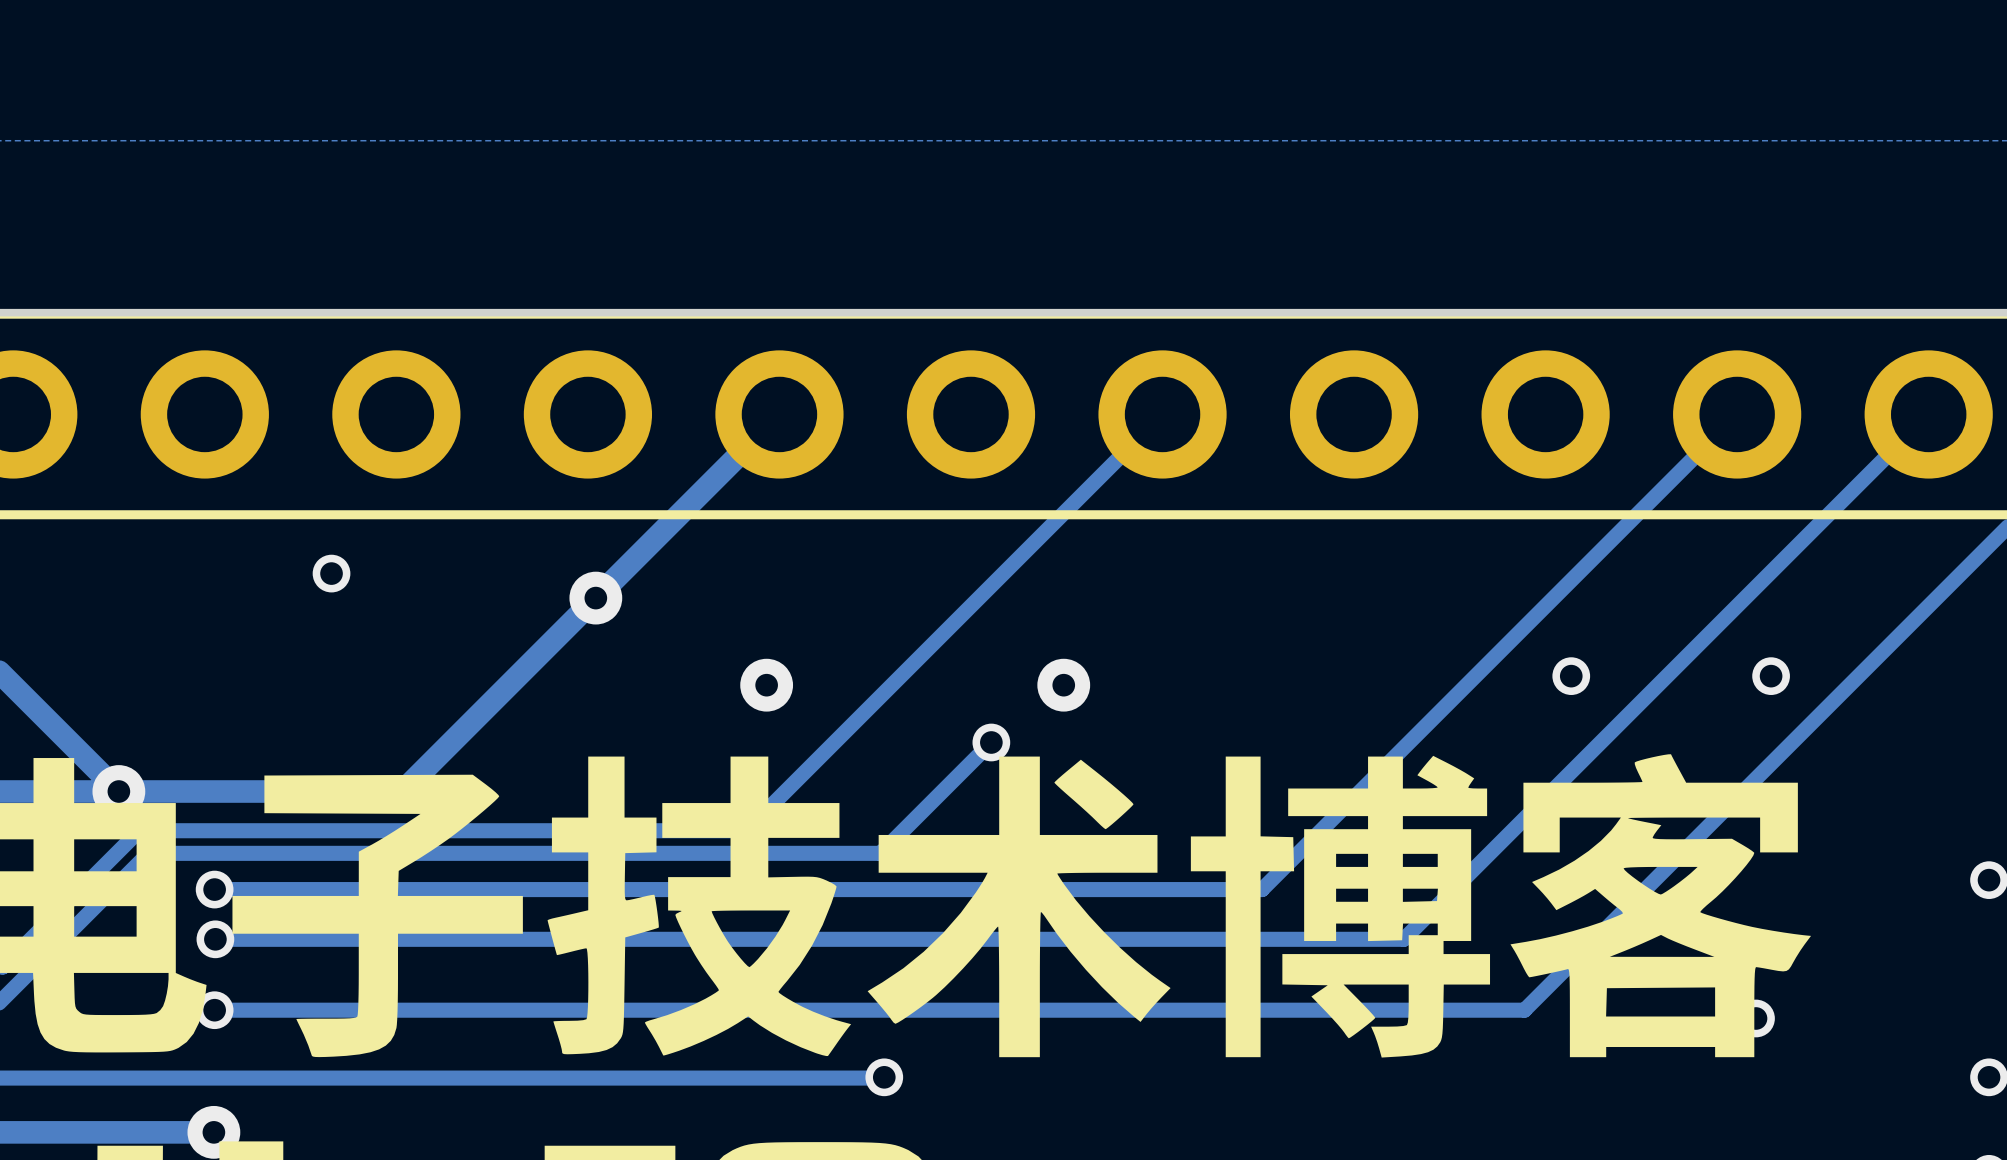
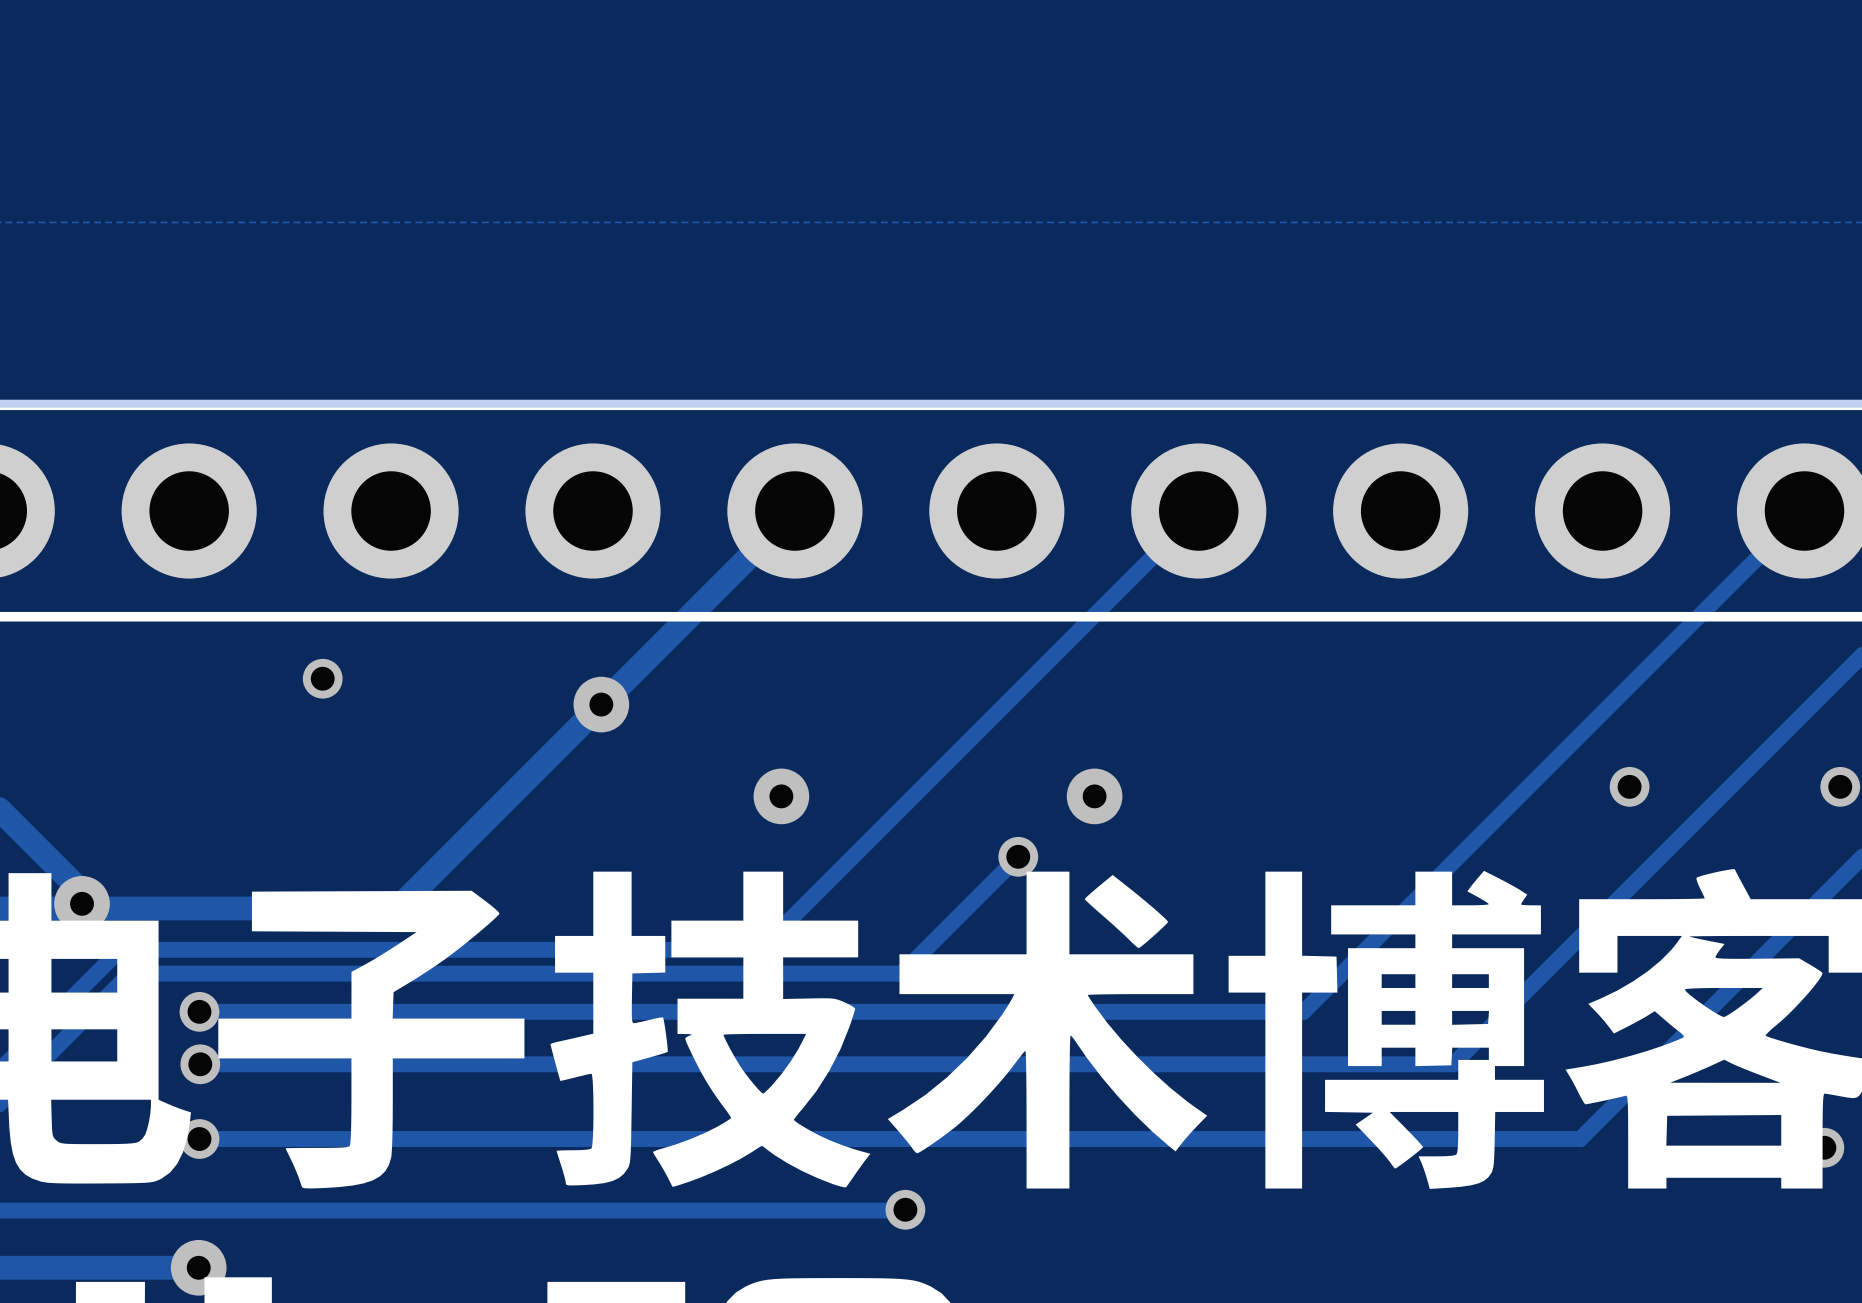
via position: (118, 791) -> (82, 903)

